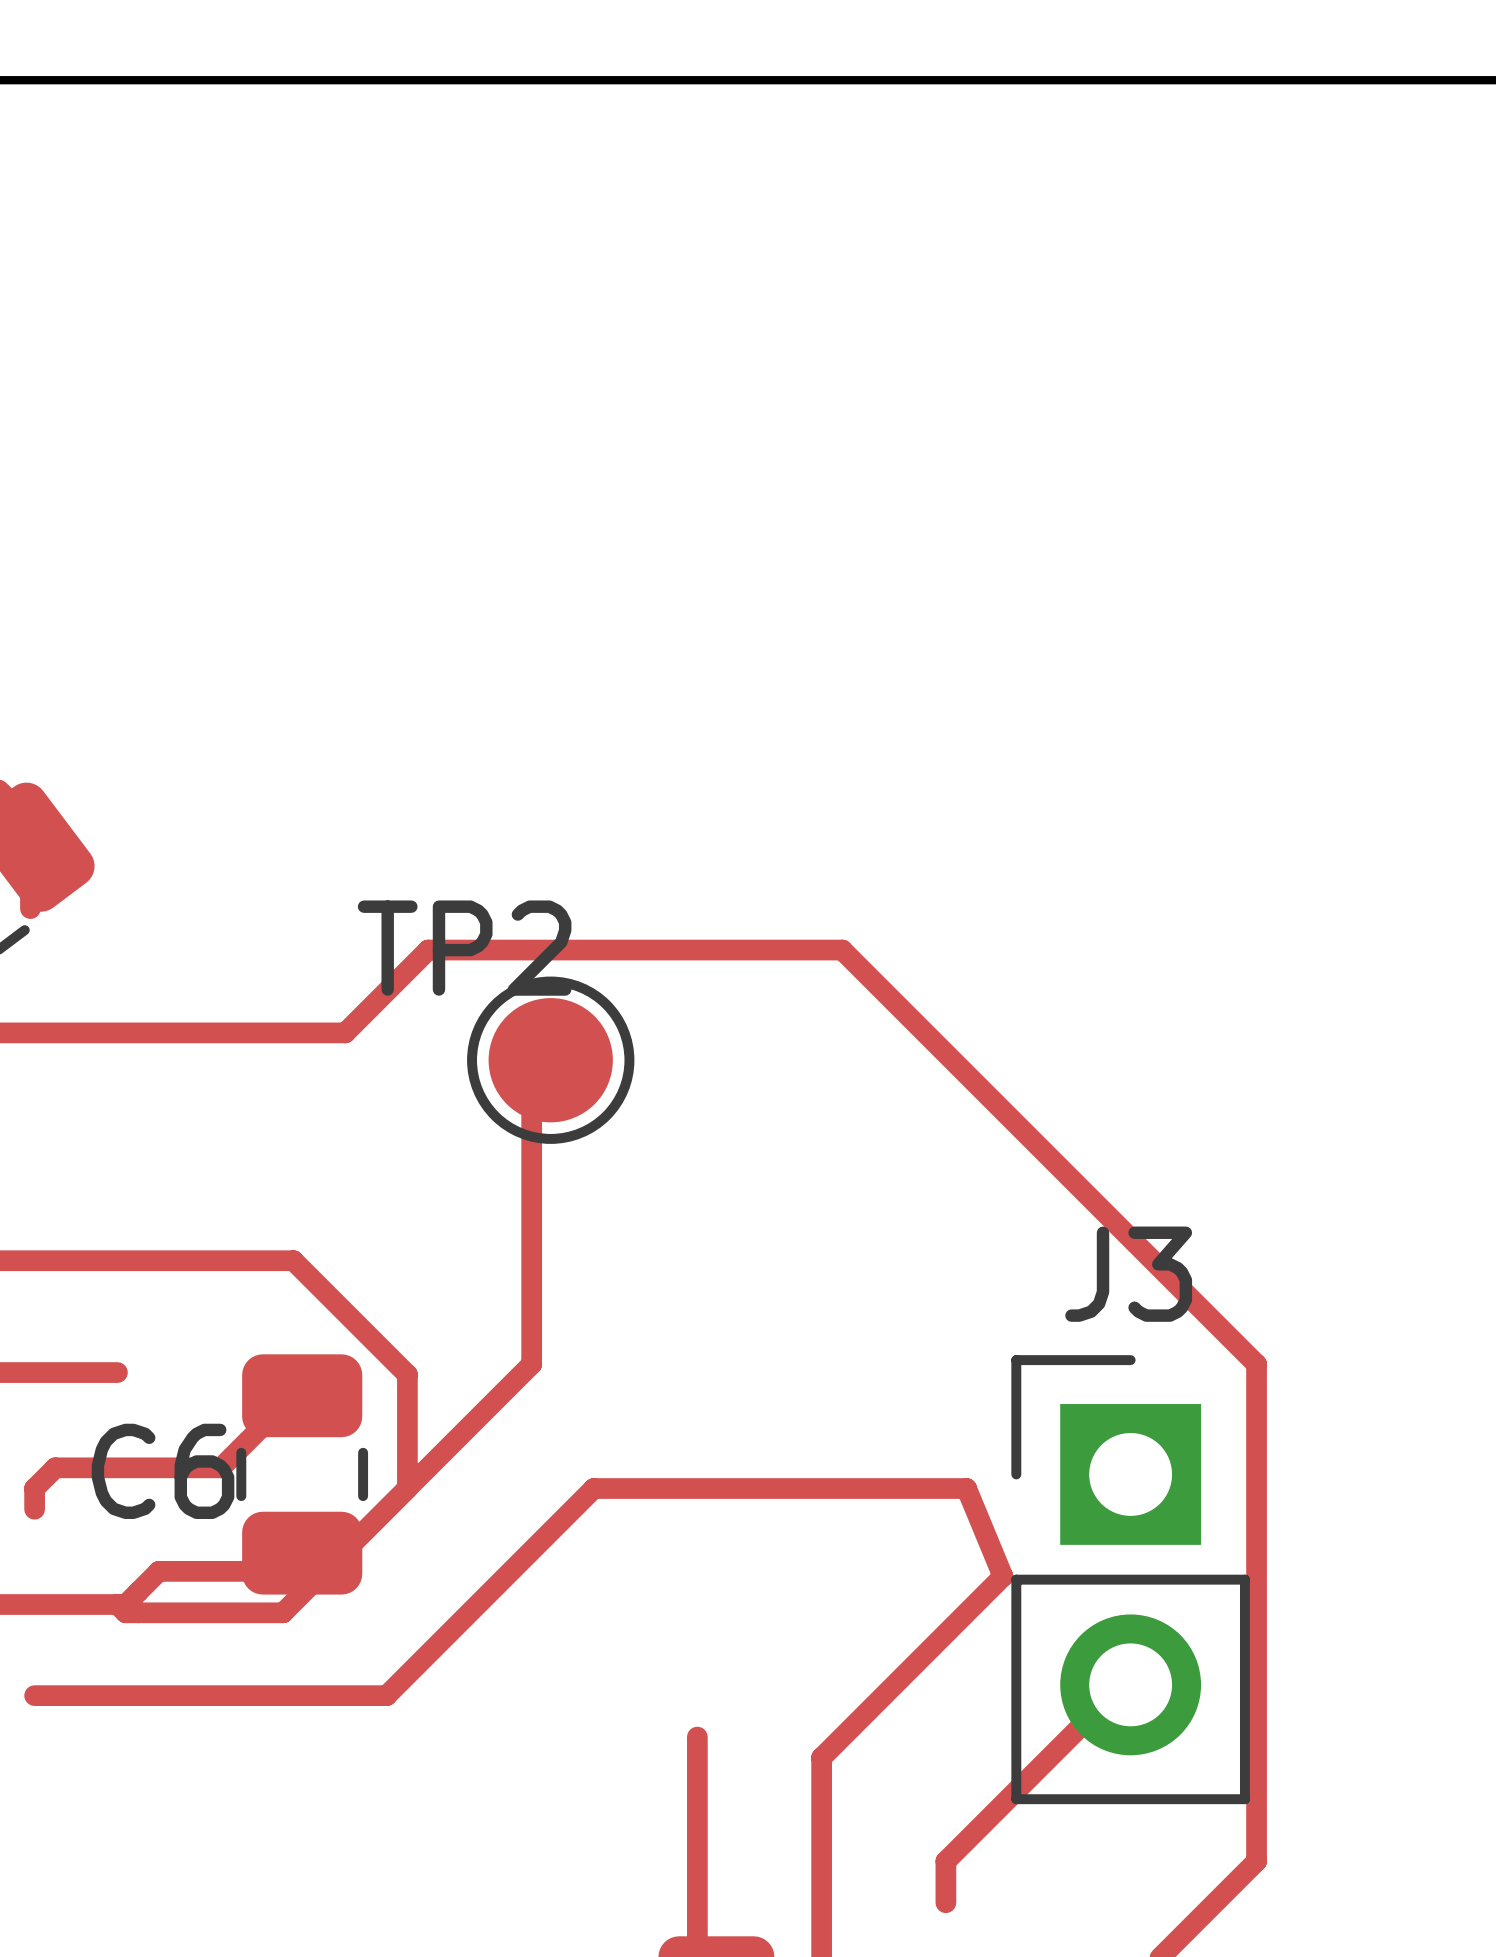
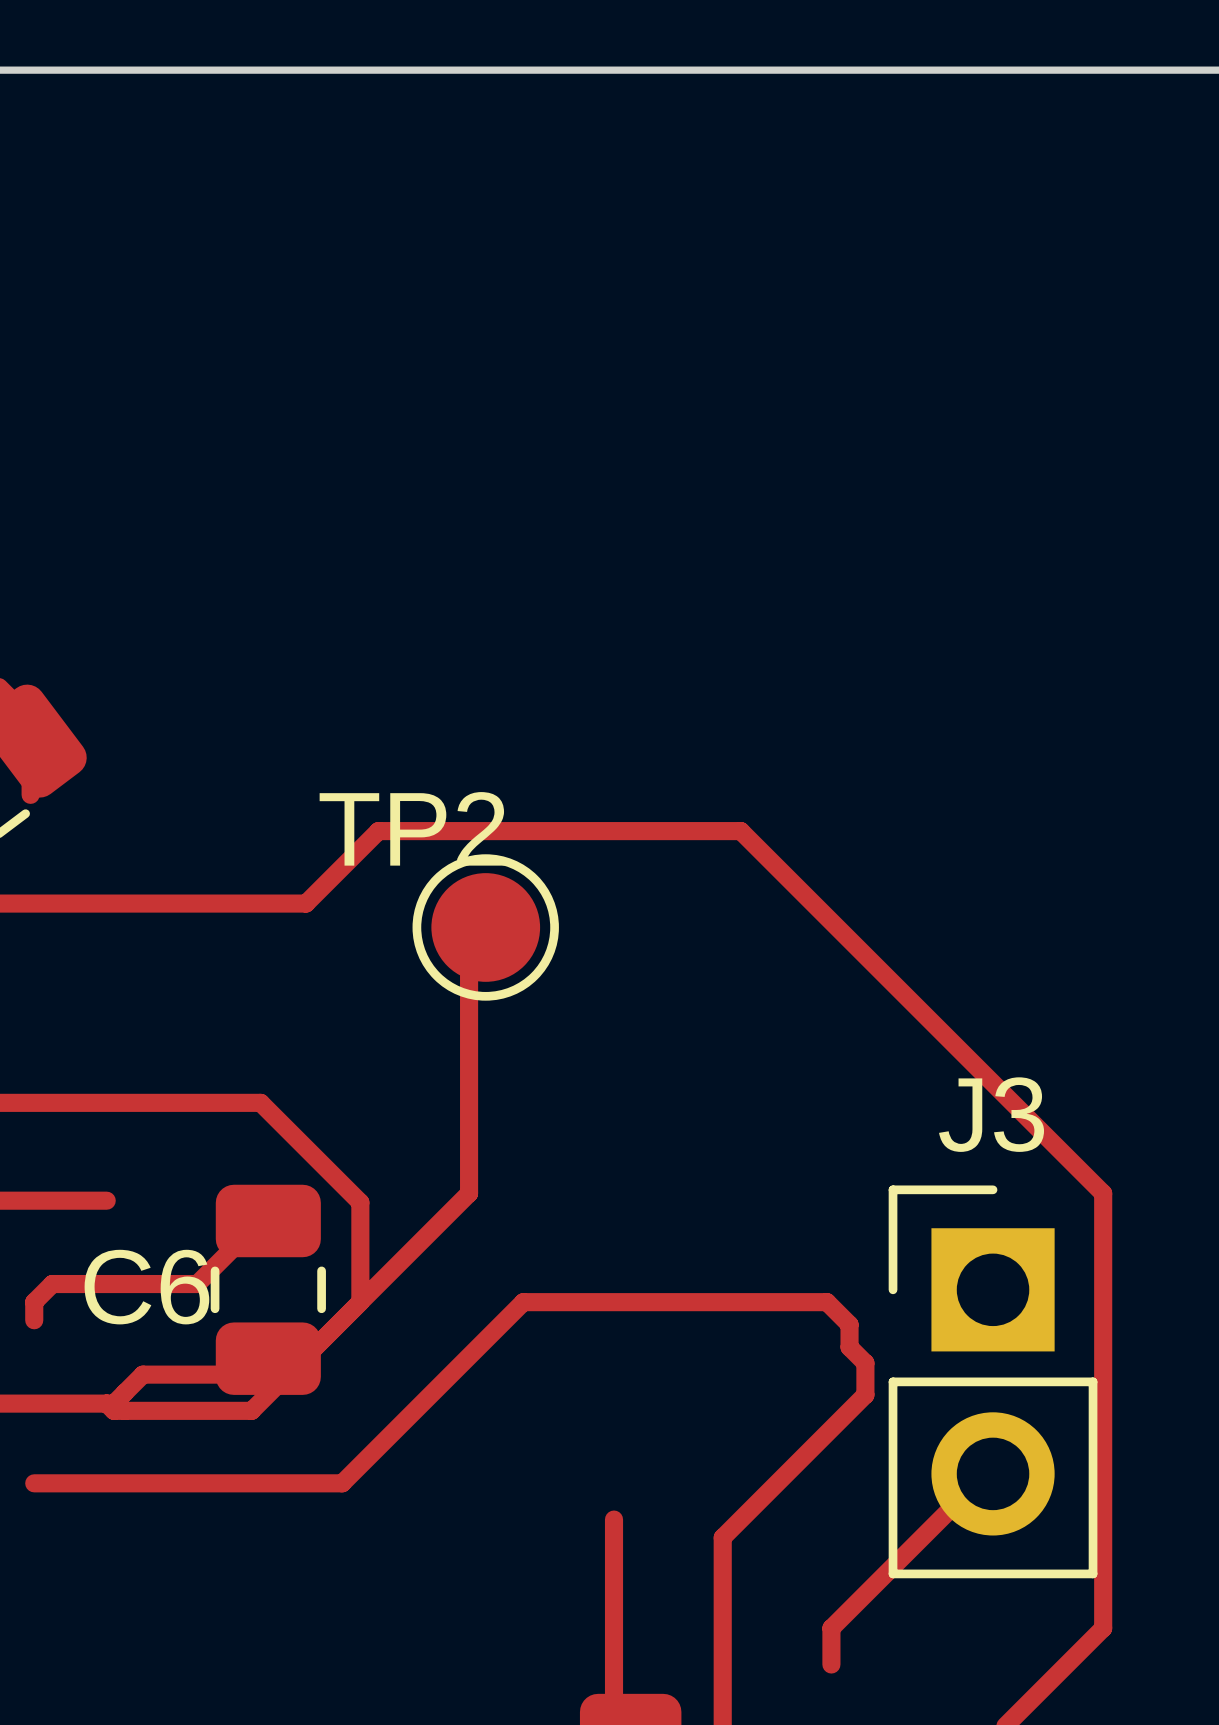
track: (940, 1488) (966, 1488) (1002, 1576) (821, 1757) -> (827, 1302) (849, 1324) (849, 1347) (865, 1363) (865, 1394) (722, 1537)

